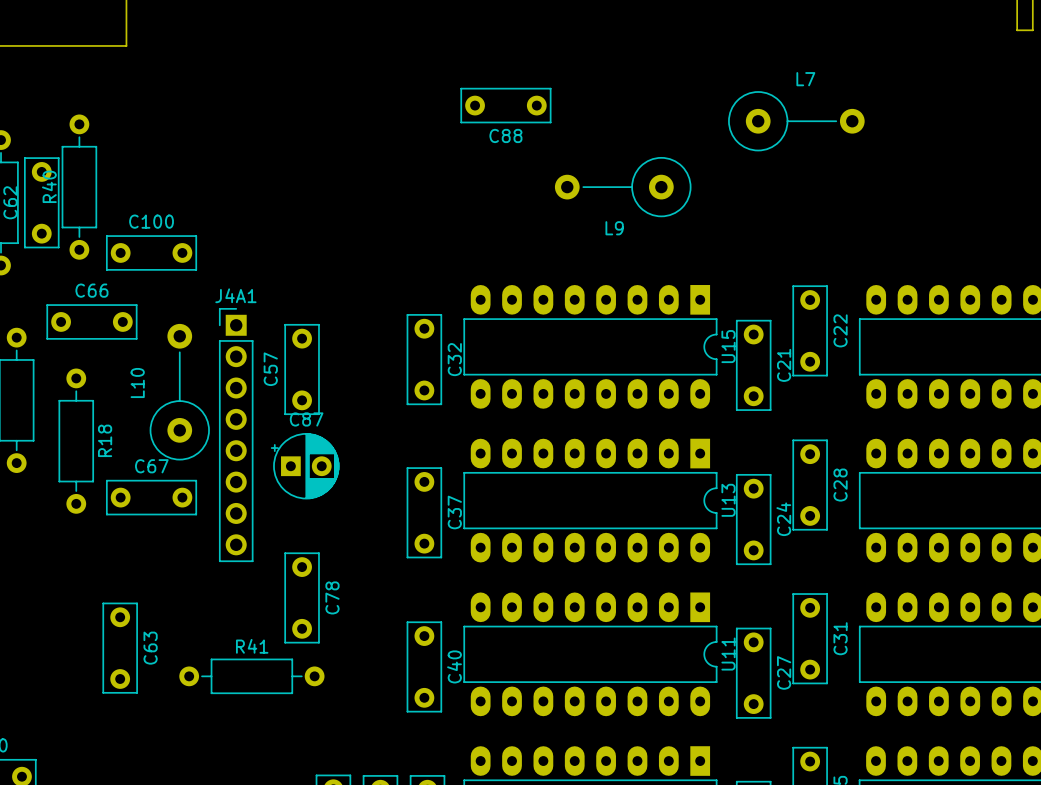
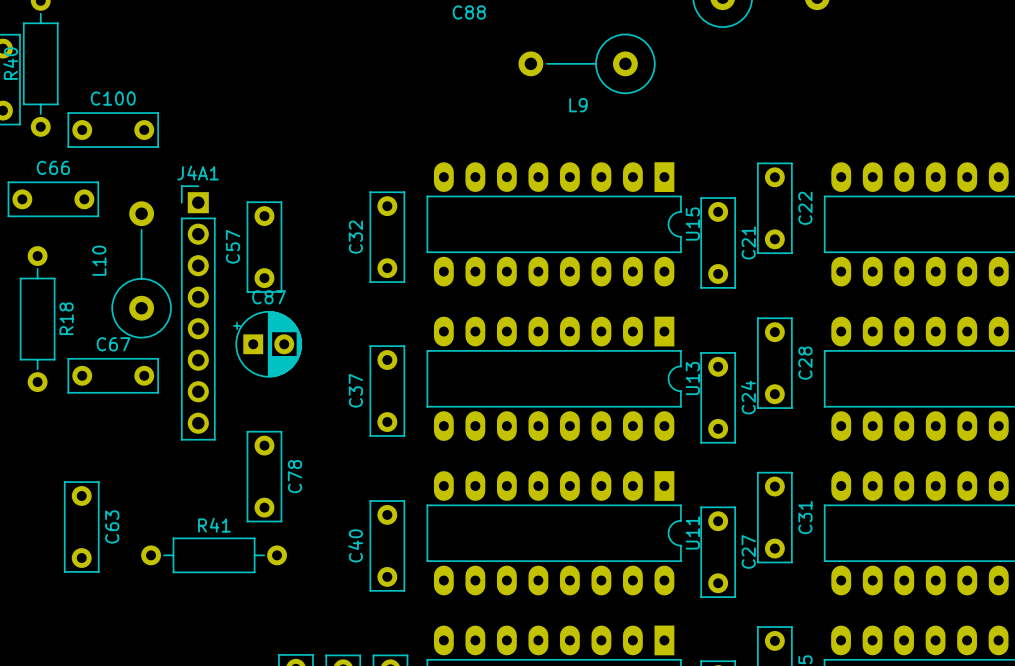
C32 name position: C32 (454, 359) -> C32 (355, 237)
C37 name position: C37 (454, 512) -> C37 (355, 390)
C40 name position: C40 (454, 666) -> C40 (355, 545)

